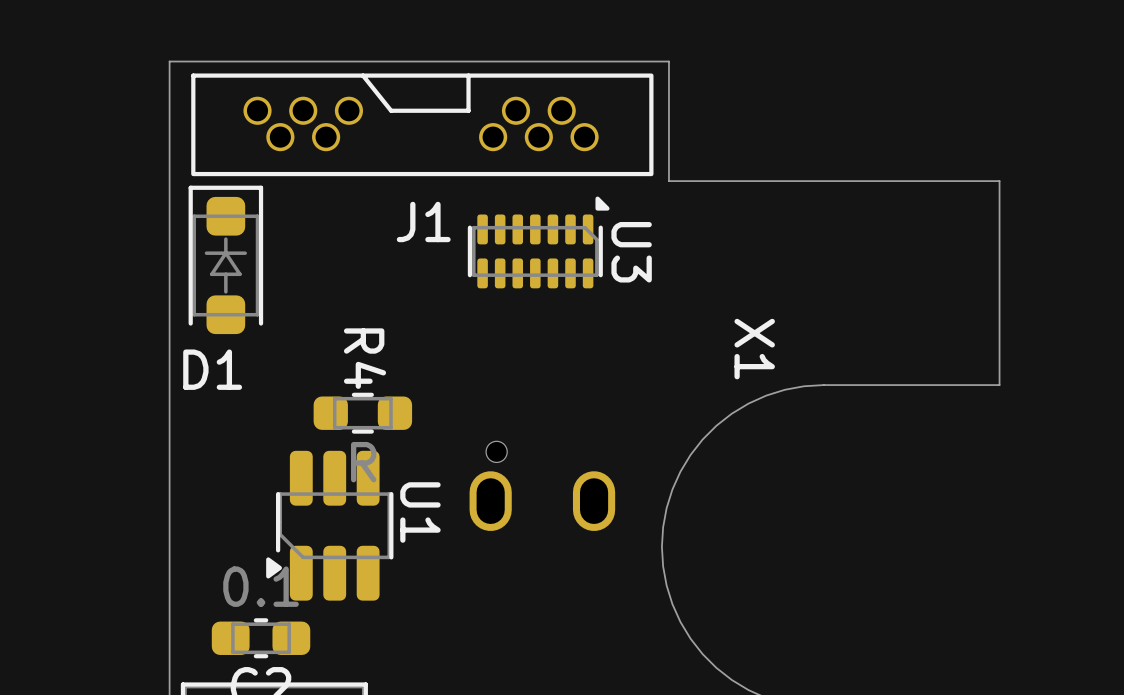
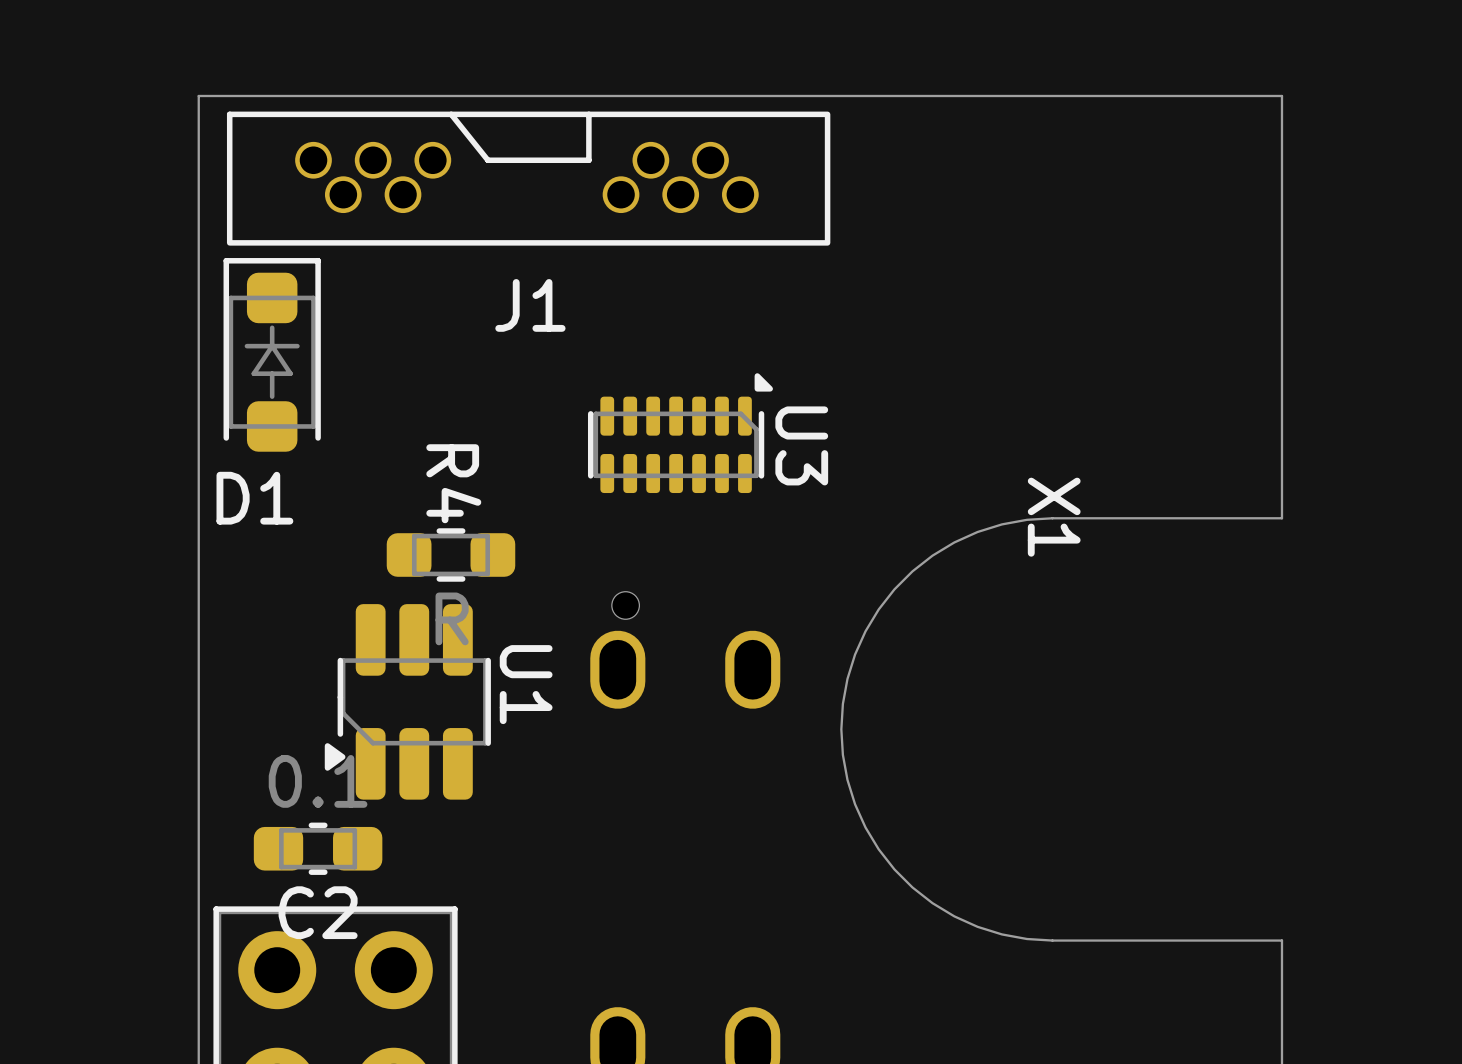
board edge: (668, 61) (668, 181) (999, 181) -> (850, 95) (1281, 95) (1281, 252)
U3 position: (538, 242) -> (680, 433)
X1 name position: X1 (754, 349) -> X1 (1054, 517)

